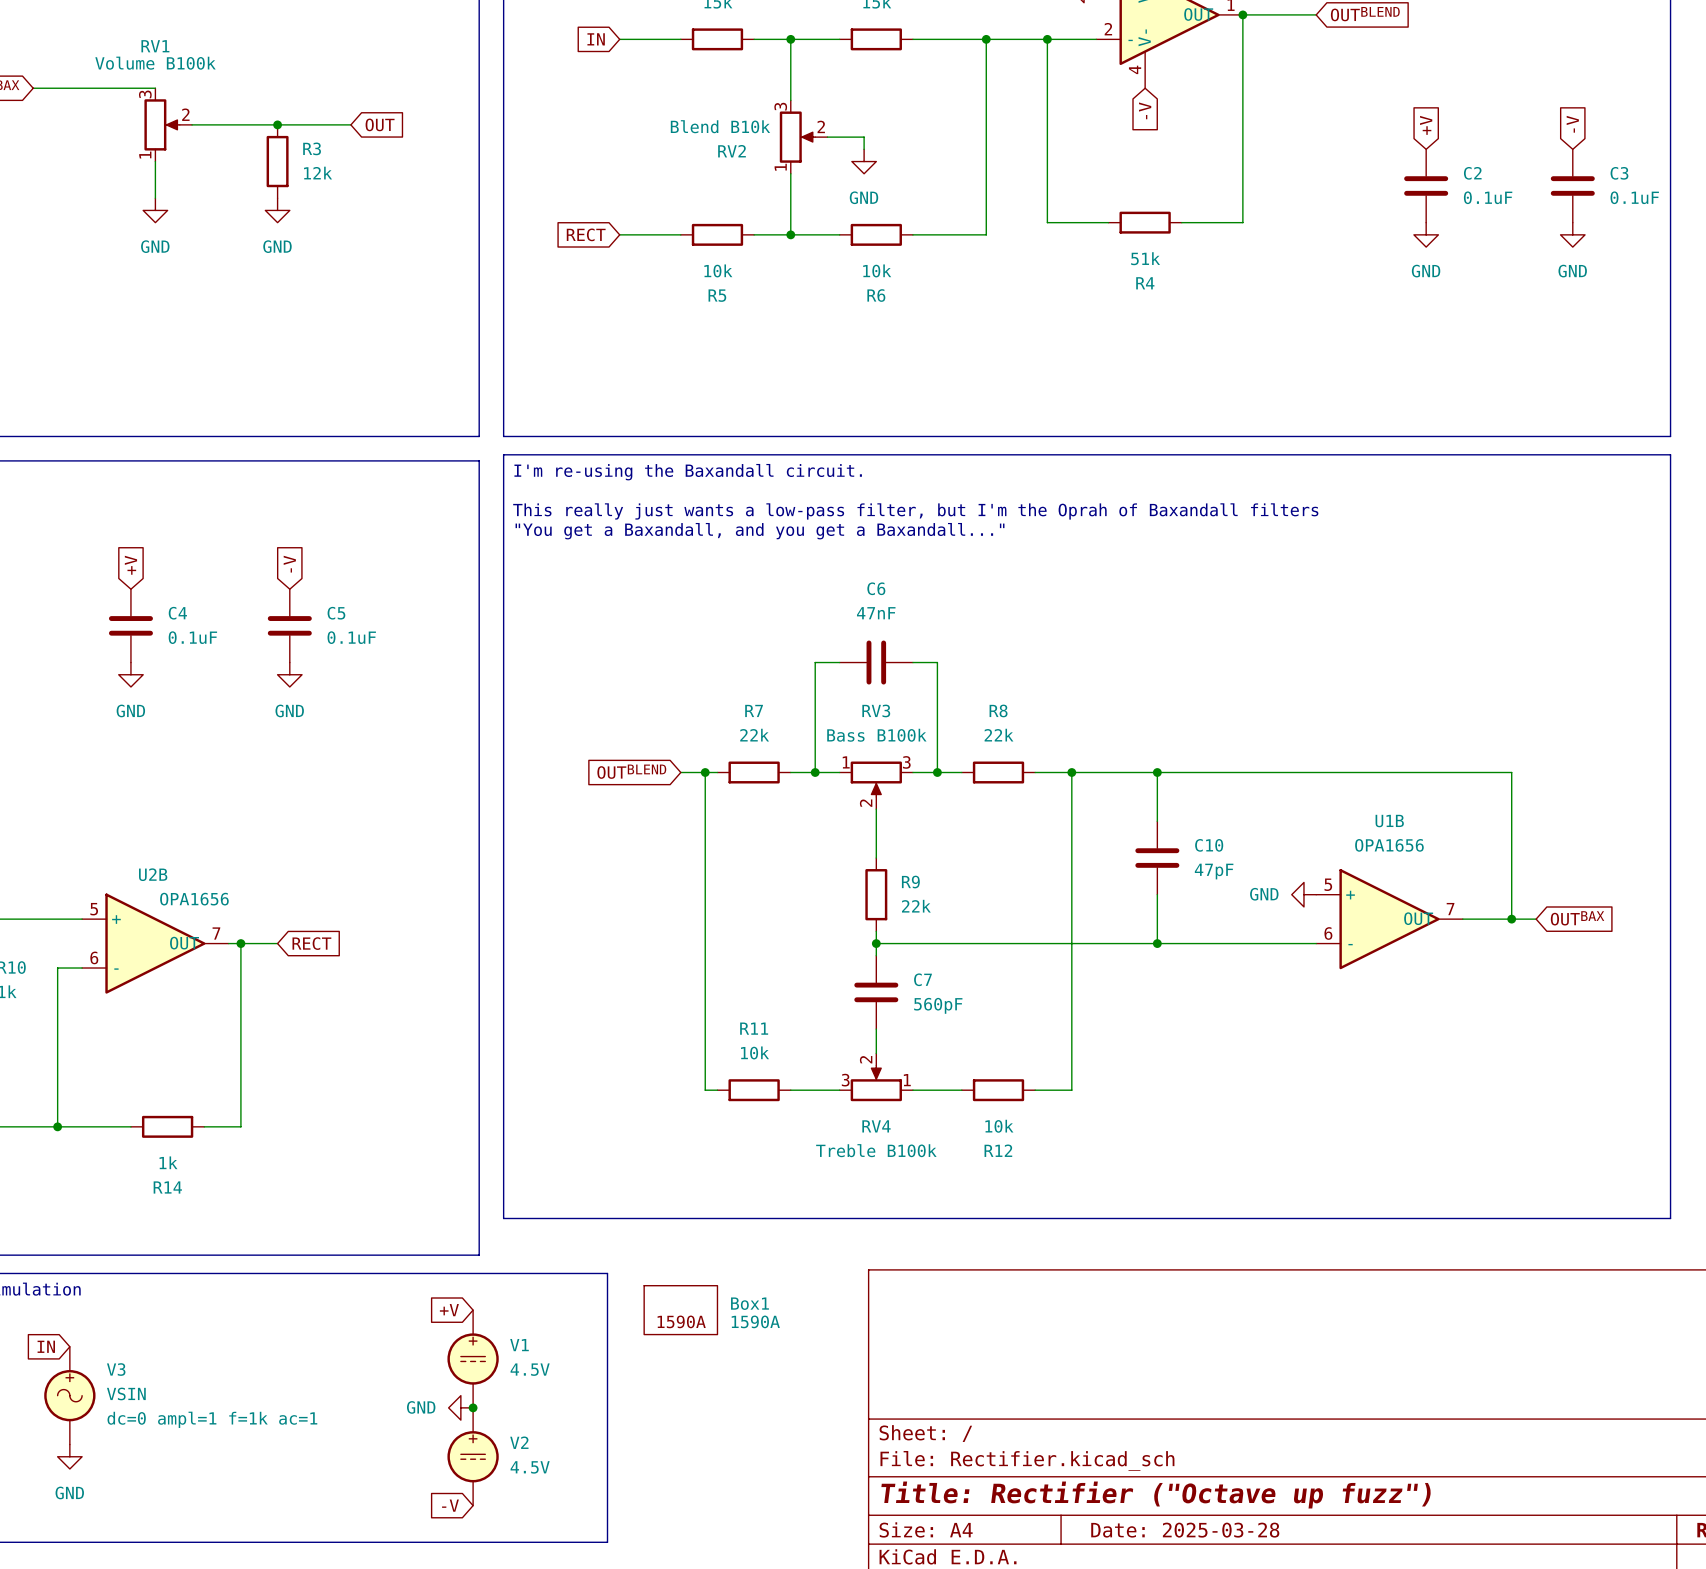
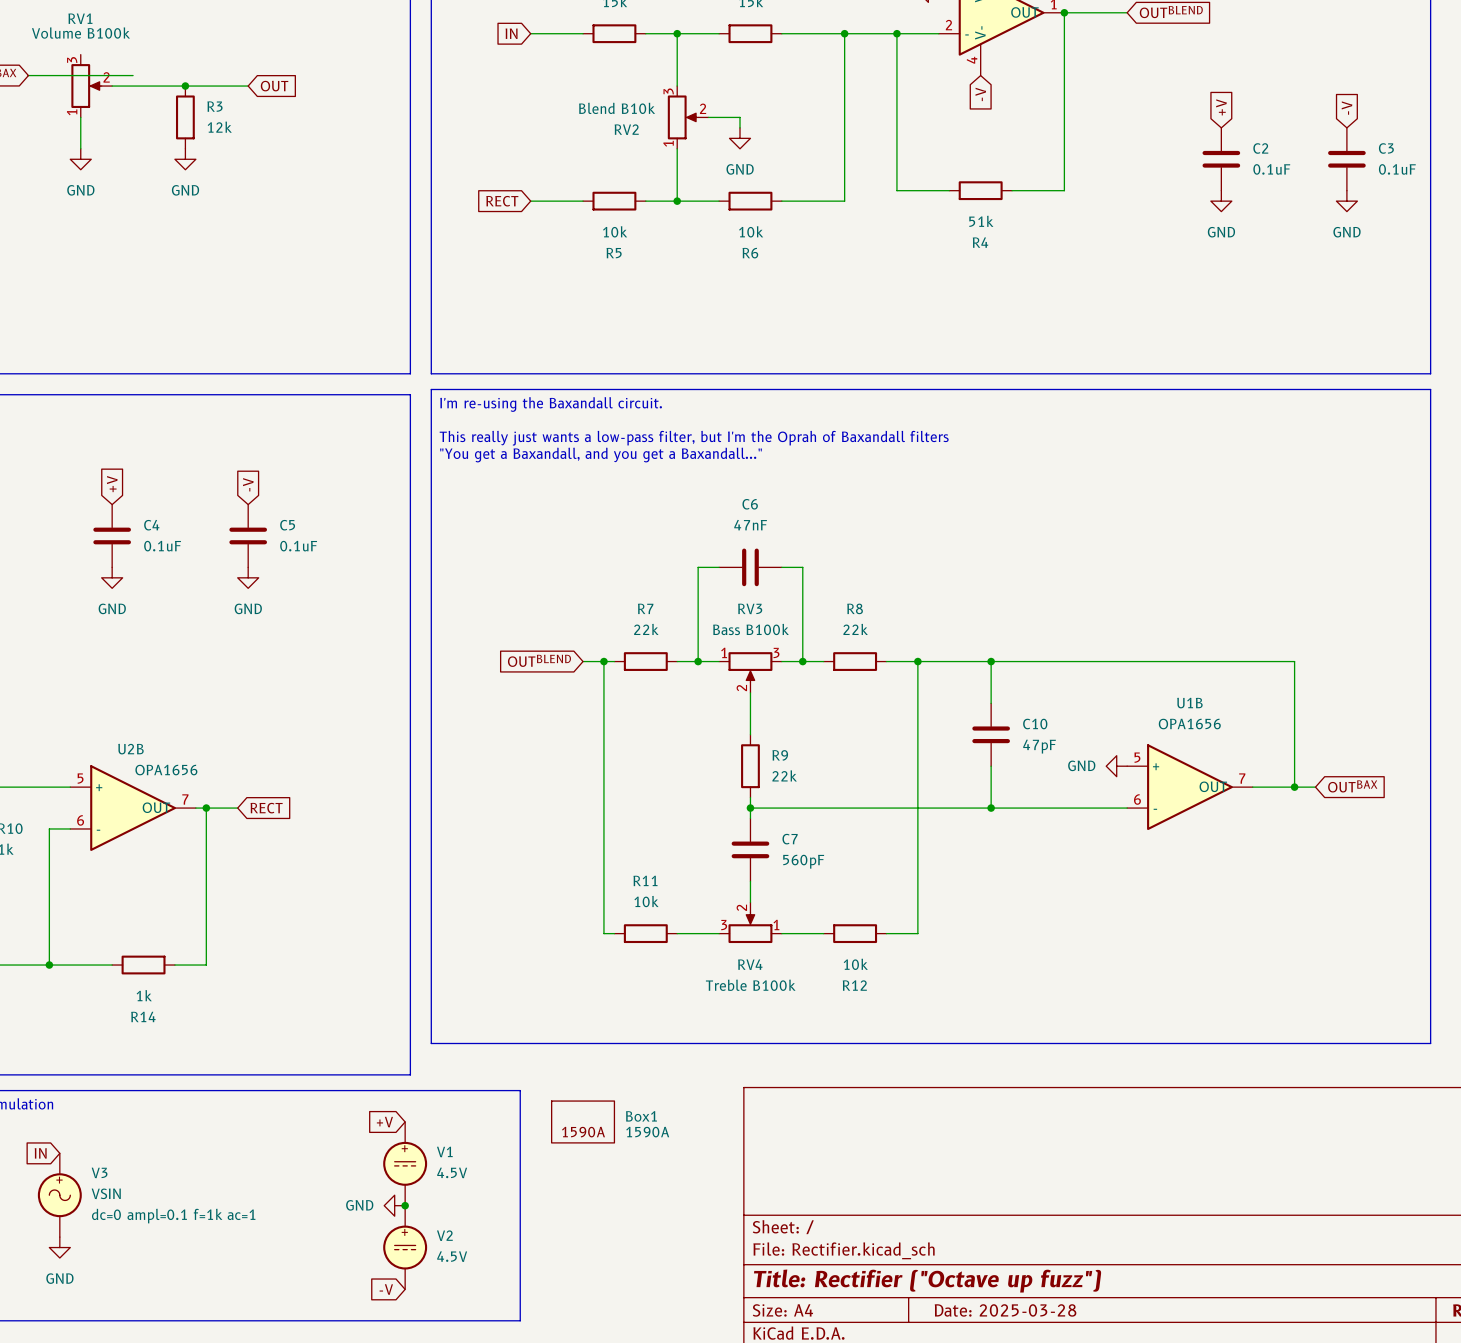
junction: none -> (185, 86)
RV1 position: (168, 124) -> (91, 86)
wire: (192, 124) (350, 124) -> (112, 86) (248, 86)
junction: (277, 124) -> none
global label position: OUT (380, 124) -> OUT (274, 86)
wire: (155, 161) (155, 198) -> (80, 117) (80, 148)
R3 position: (277, 161) -> (185, 117)
power symbol: none -> GND (80, 159)
power symbol: none -> GND (185, 159)
power symbol: GND (155, 210) -> none
power symbol: GND (277, 210) -> none
V3 text: dc=0 ampl=1 f=1k ac=1 (212, 1419) -> dc=0 ampl=0.1 f=1k ac=1 (173, 1216)

